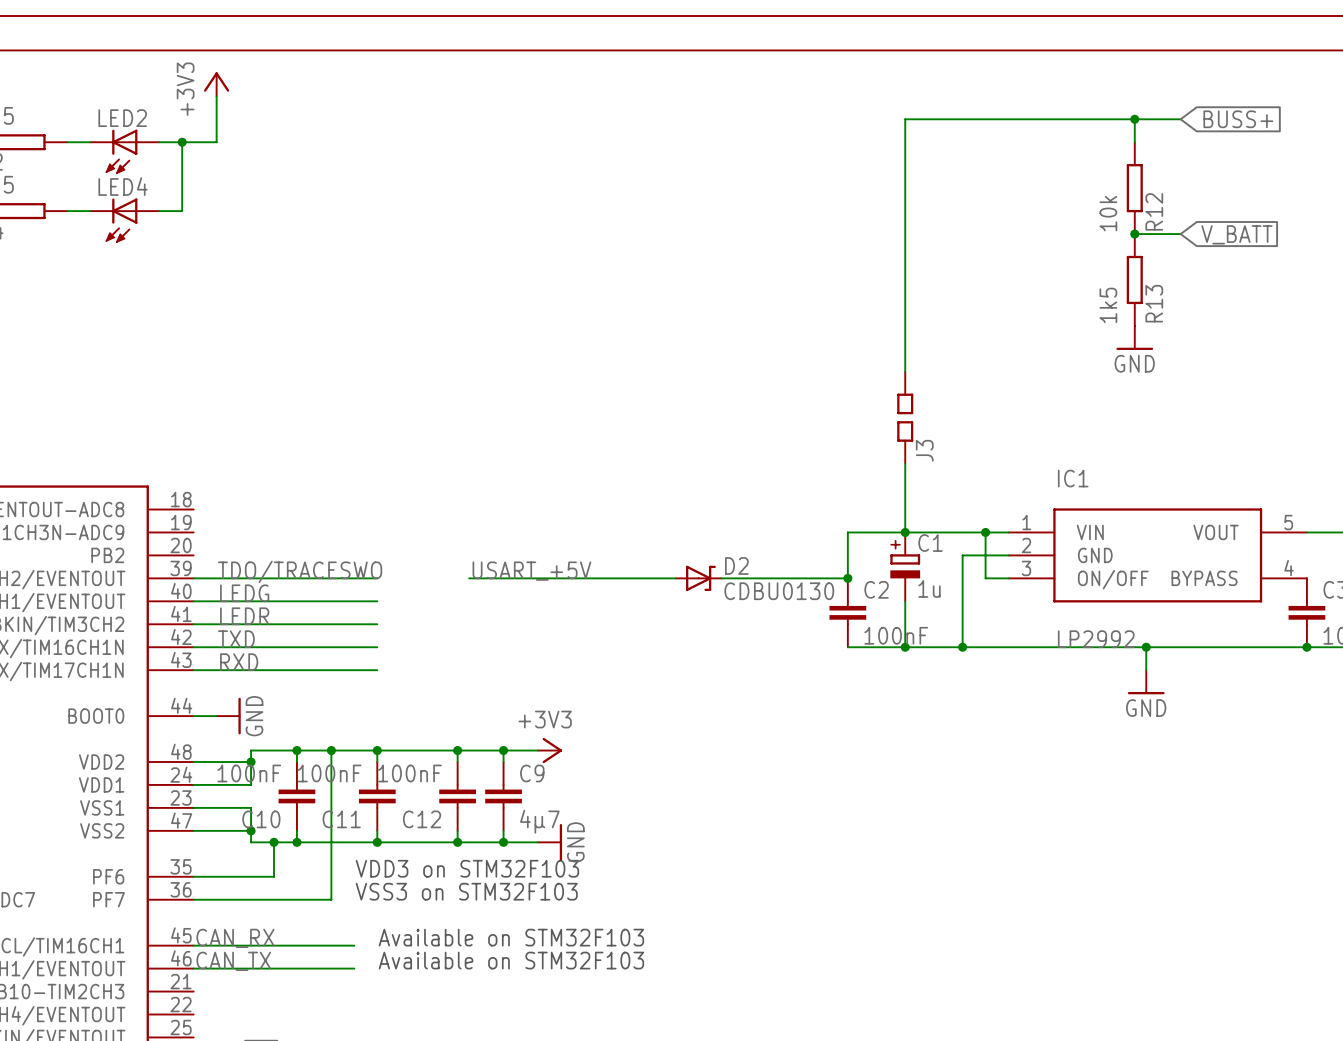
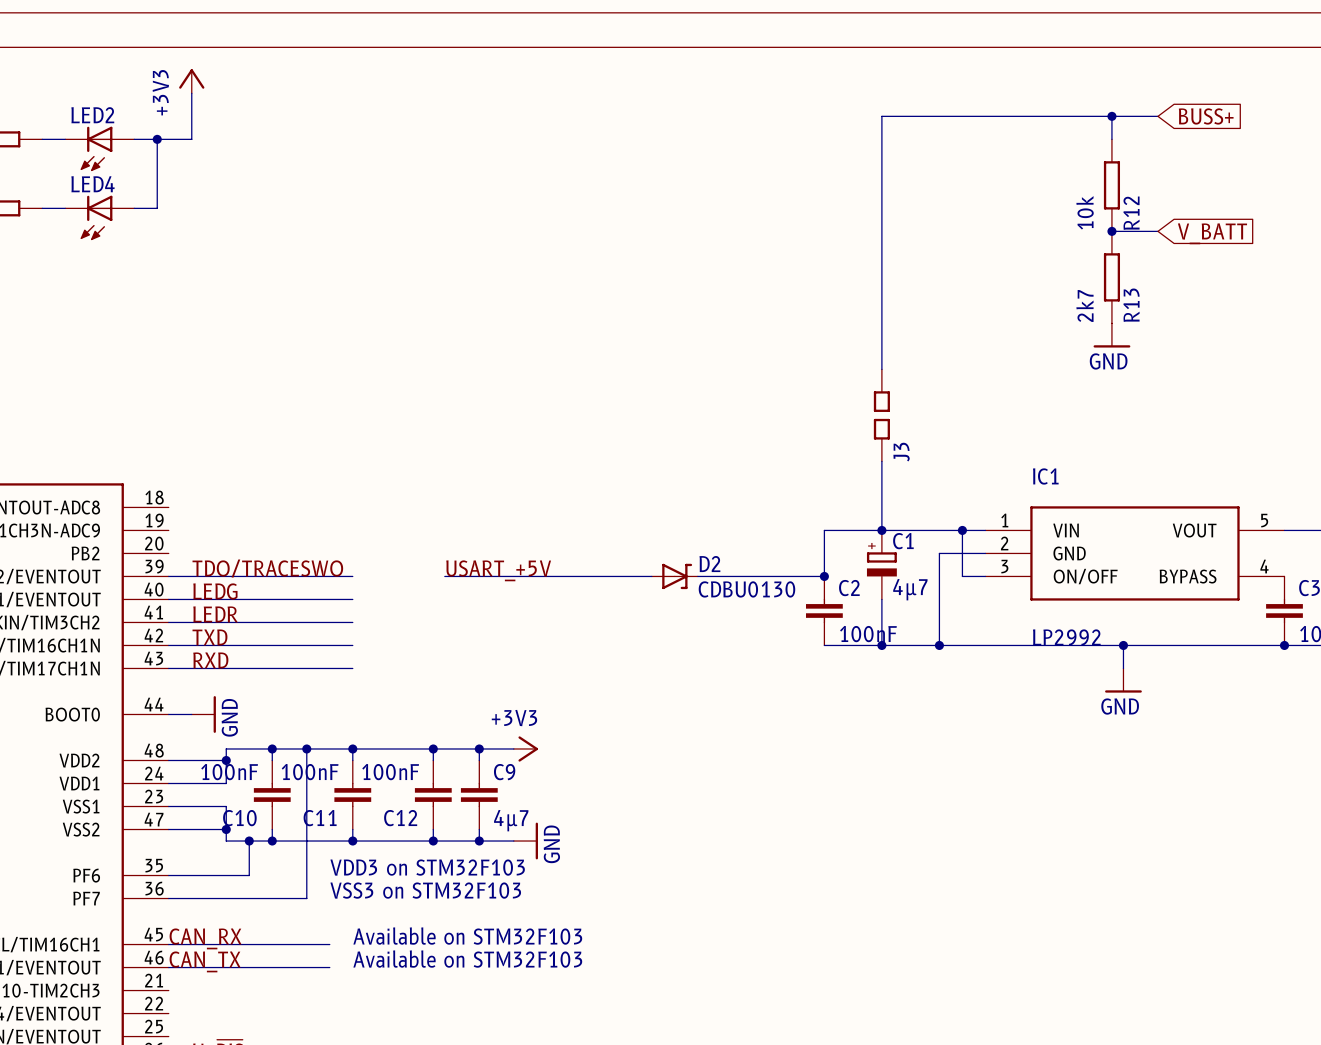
R13 value: 1k5 (1108, 305) -> 2k7 (1084, 305)
C1 value: 1u (929, 588) -> 4µ7 (910, 589)

